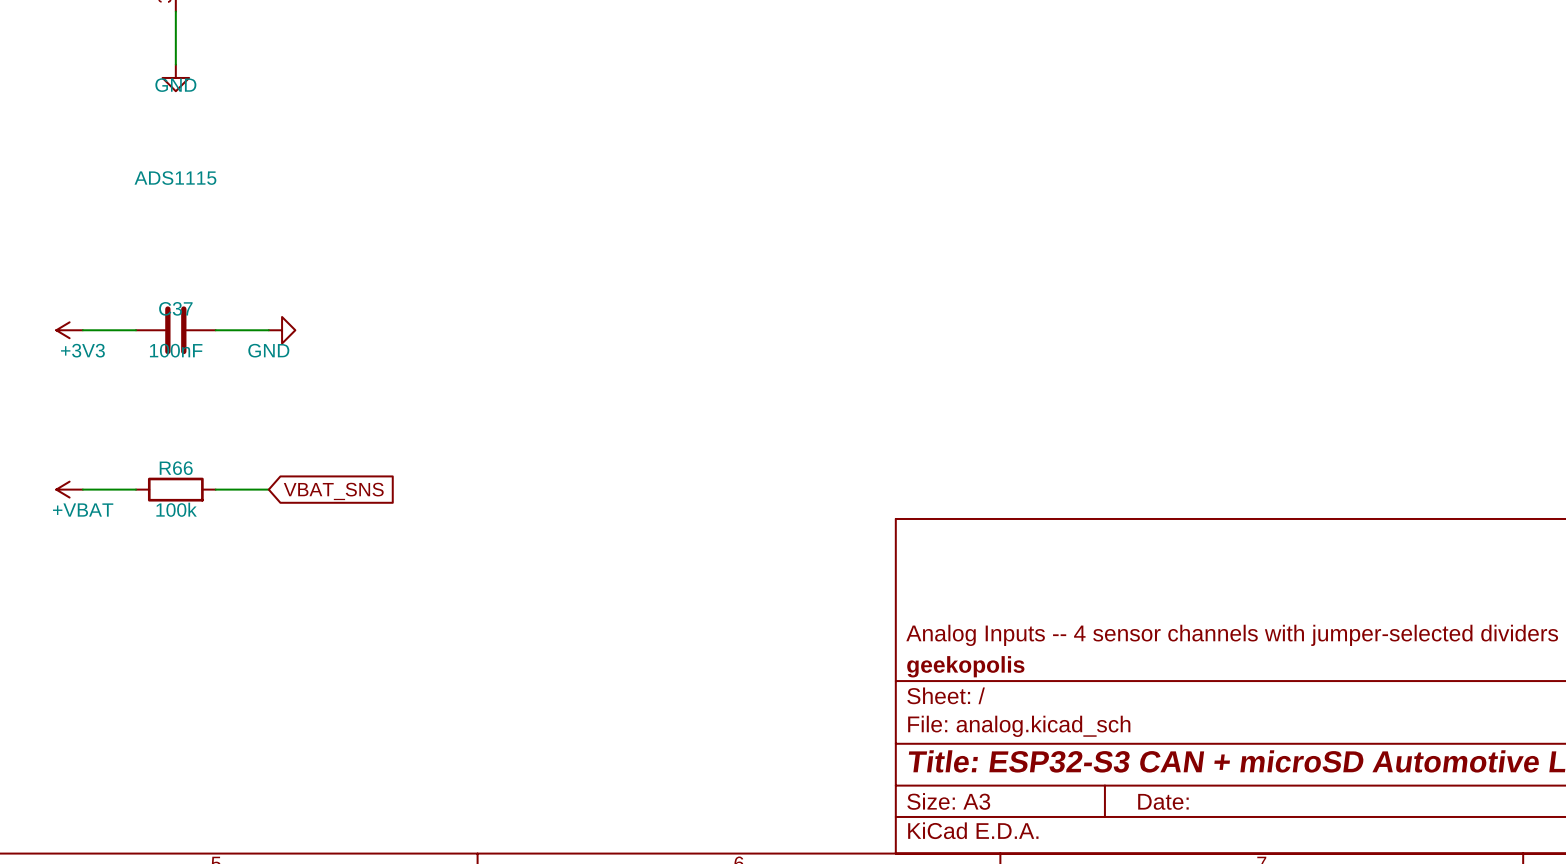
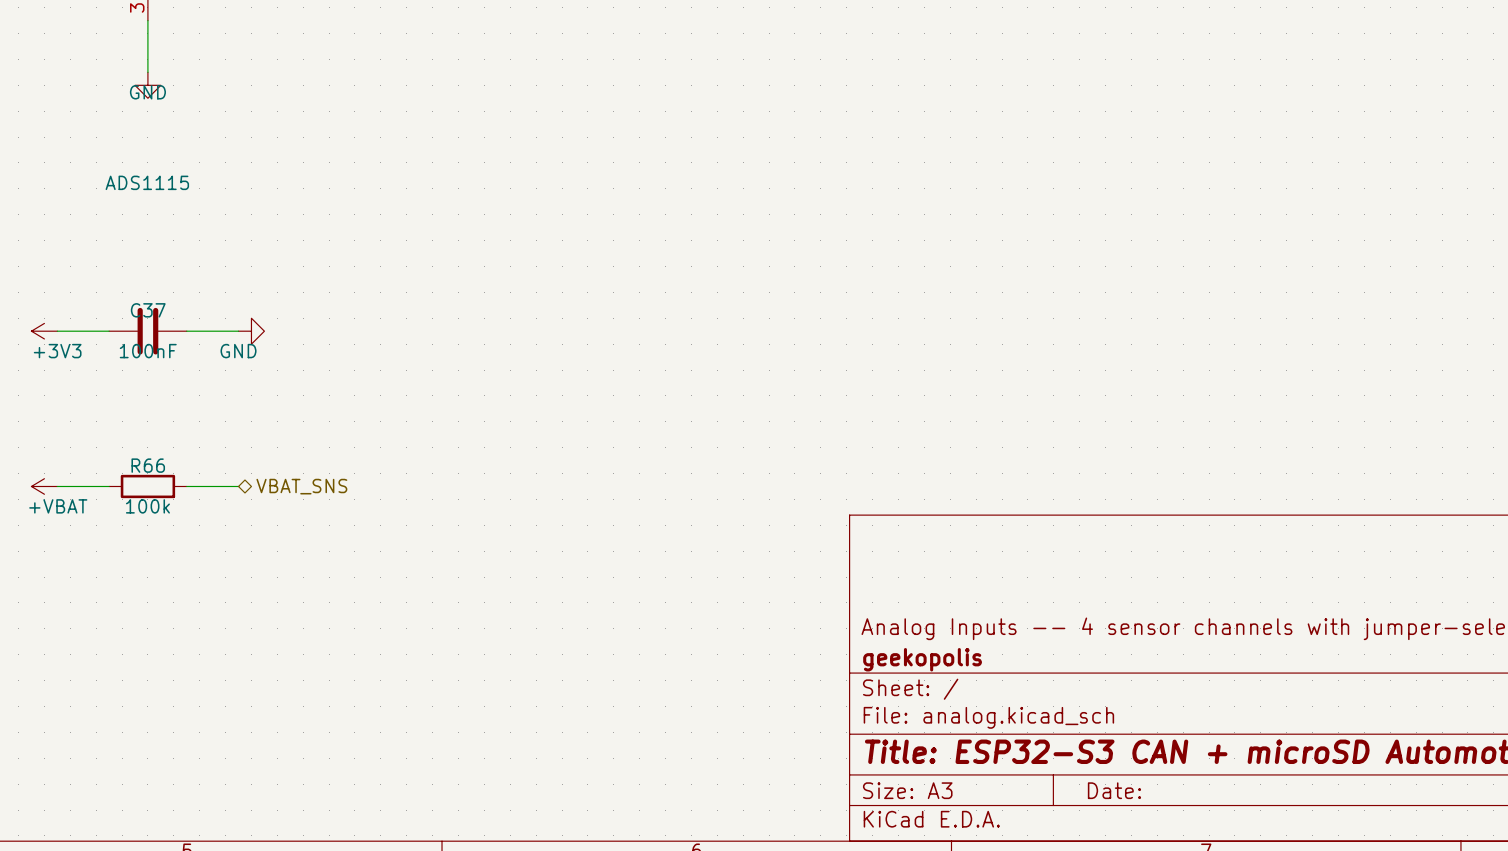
hierarchical label: none -> VBAT_SNS (301, 486)
global label: VBAT_SNS (333, 491) -> none

